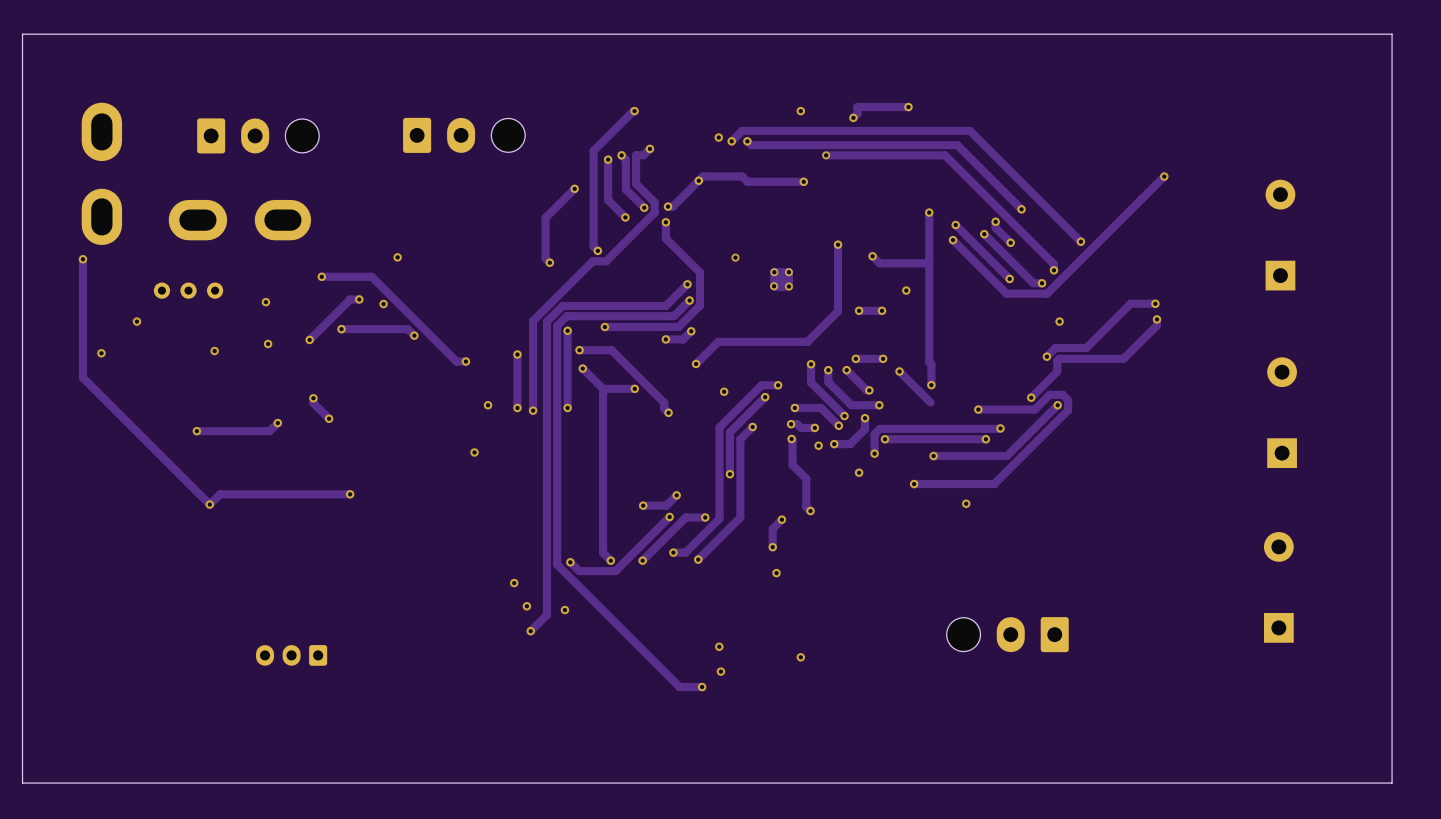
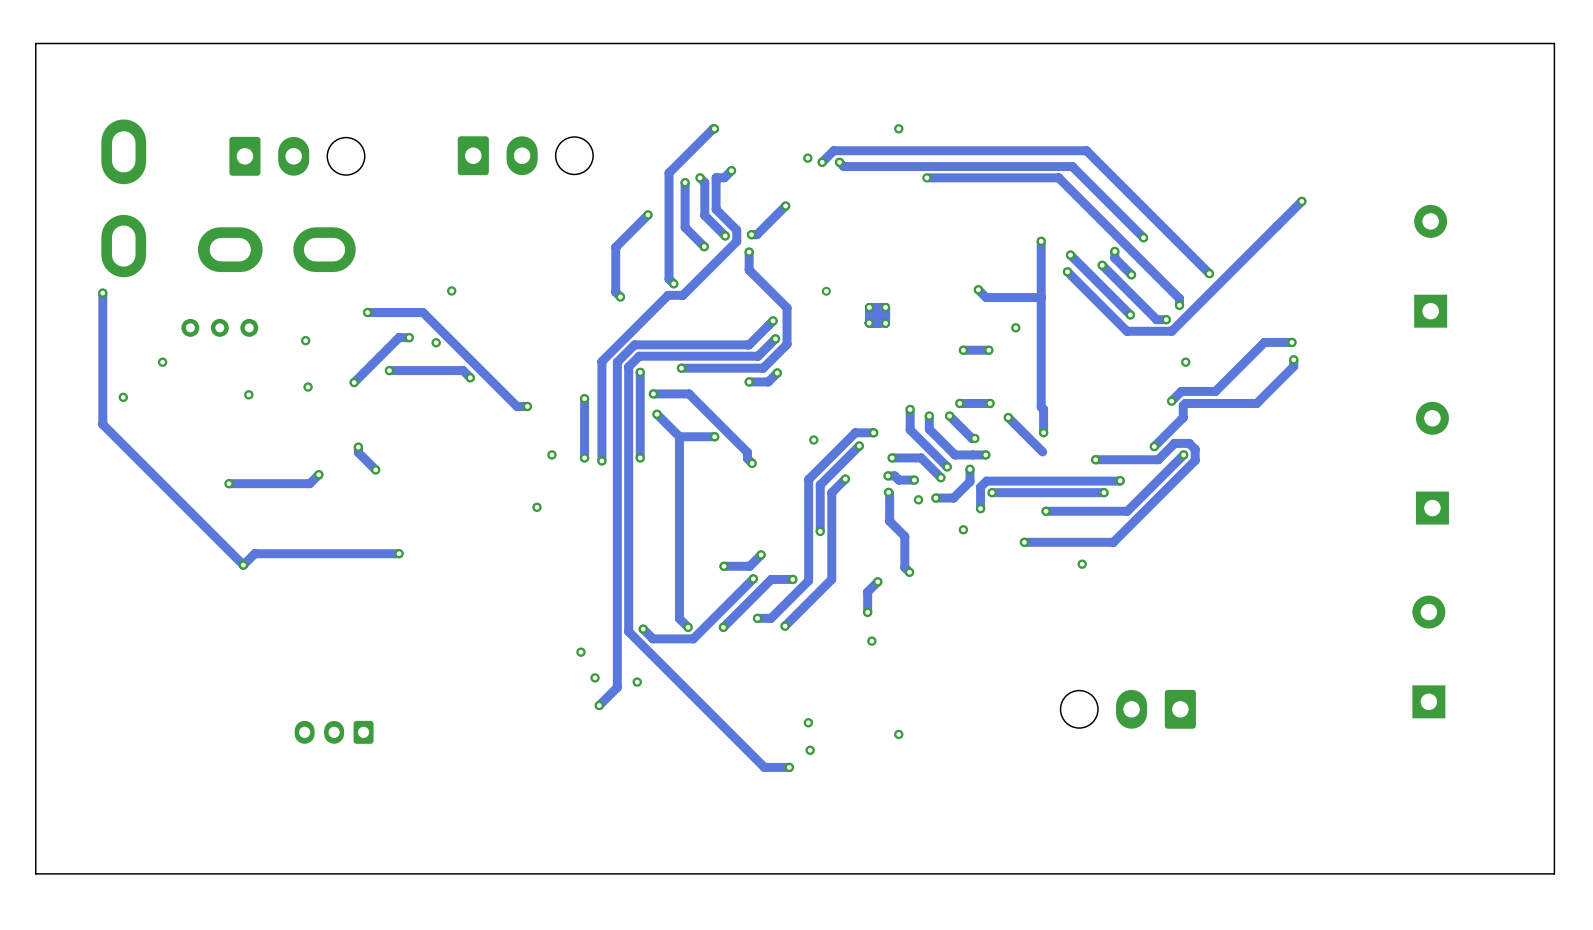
track: (908, 107) (857, 107) (857, 113) (853, 117) -> none
via: (908, 107) -> none
via: (853, 117) -> none
track: (698, 180) (703, 176) (742, 176) (747, 181) (803, 181) -> none
via: (803, 181) -> none
track: (838, 244) (838, 311) (807, 341) (718, 341) (696, 363) -> none
via: (838, 244) -> none
via: (696, 363) -> none

